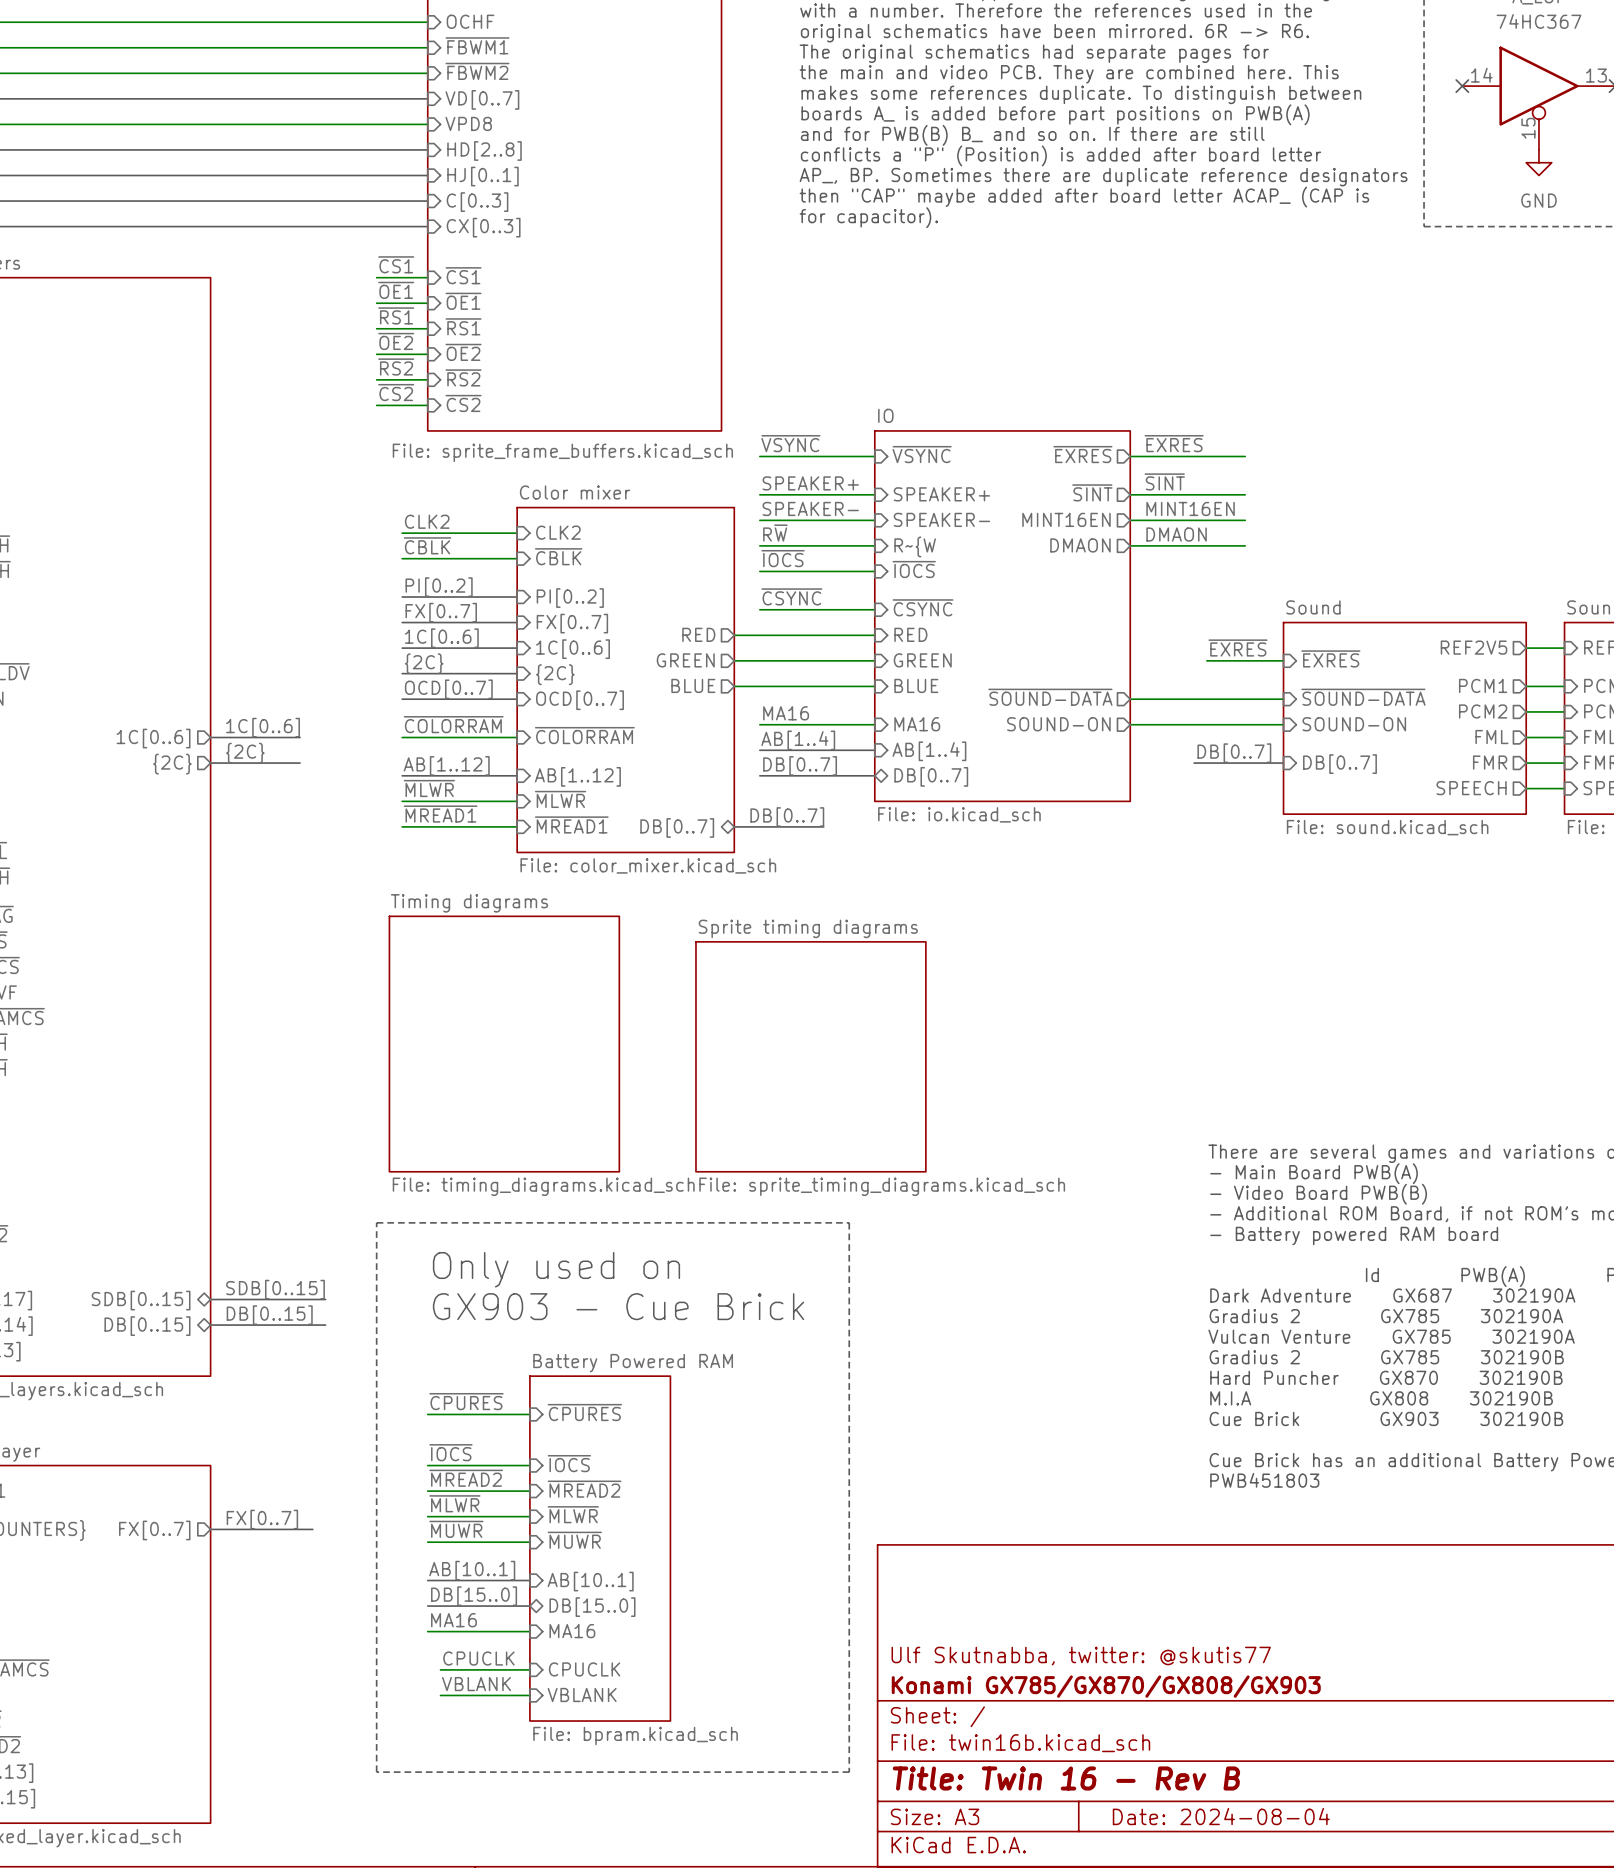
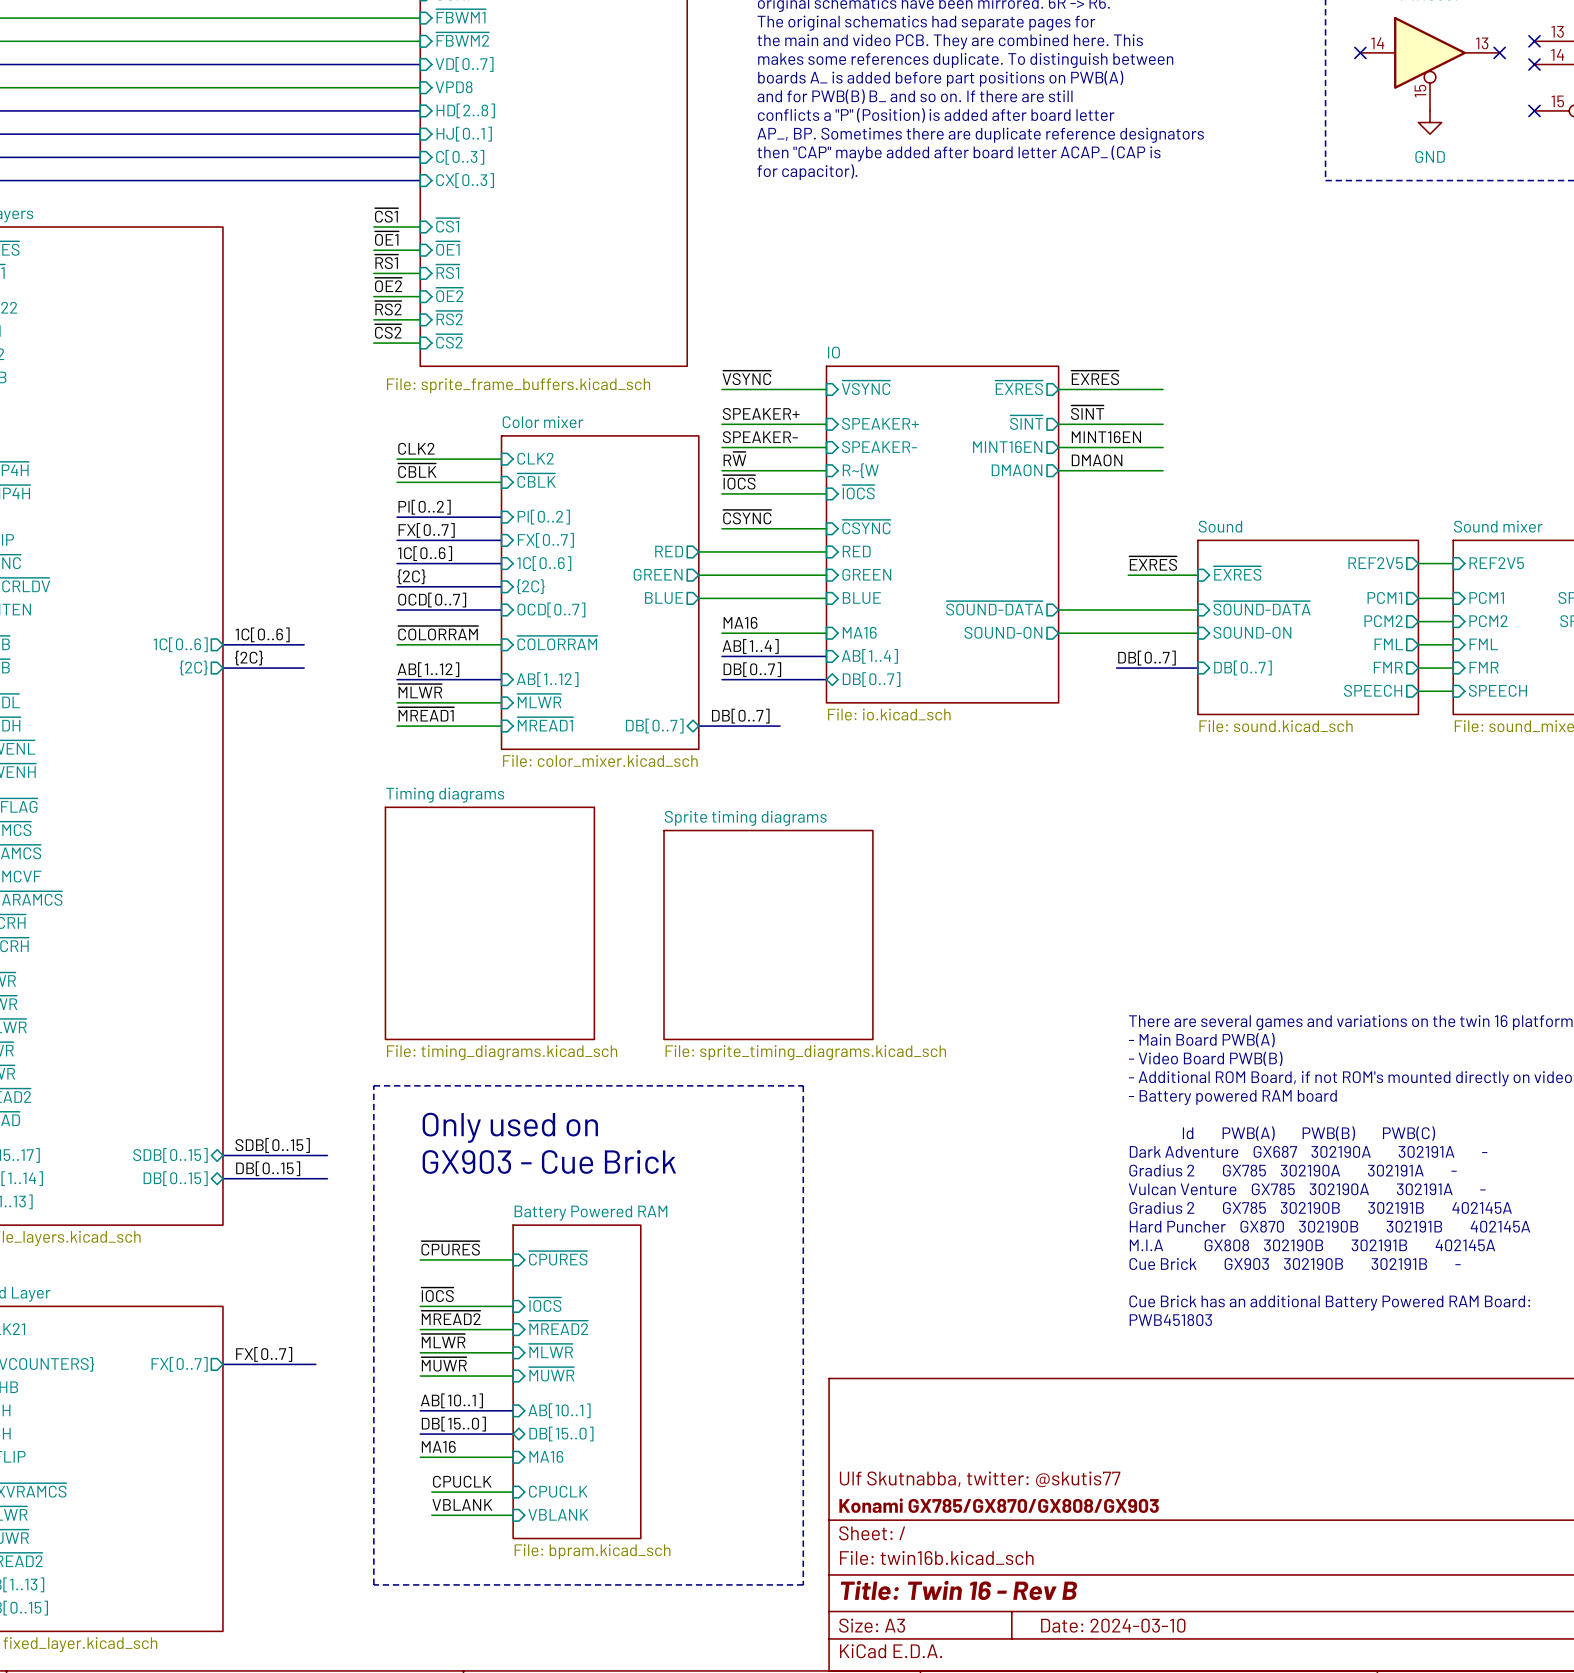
title block: Date: 2024-08-04 (1221, 1816) -> Date: 2024-03-10 (1113, 1625)

